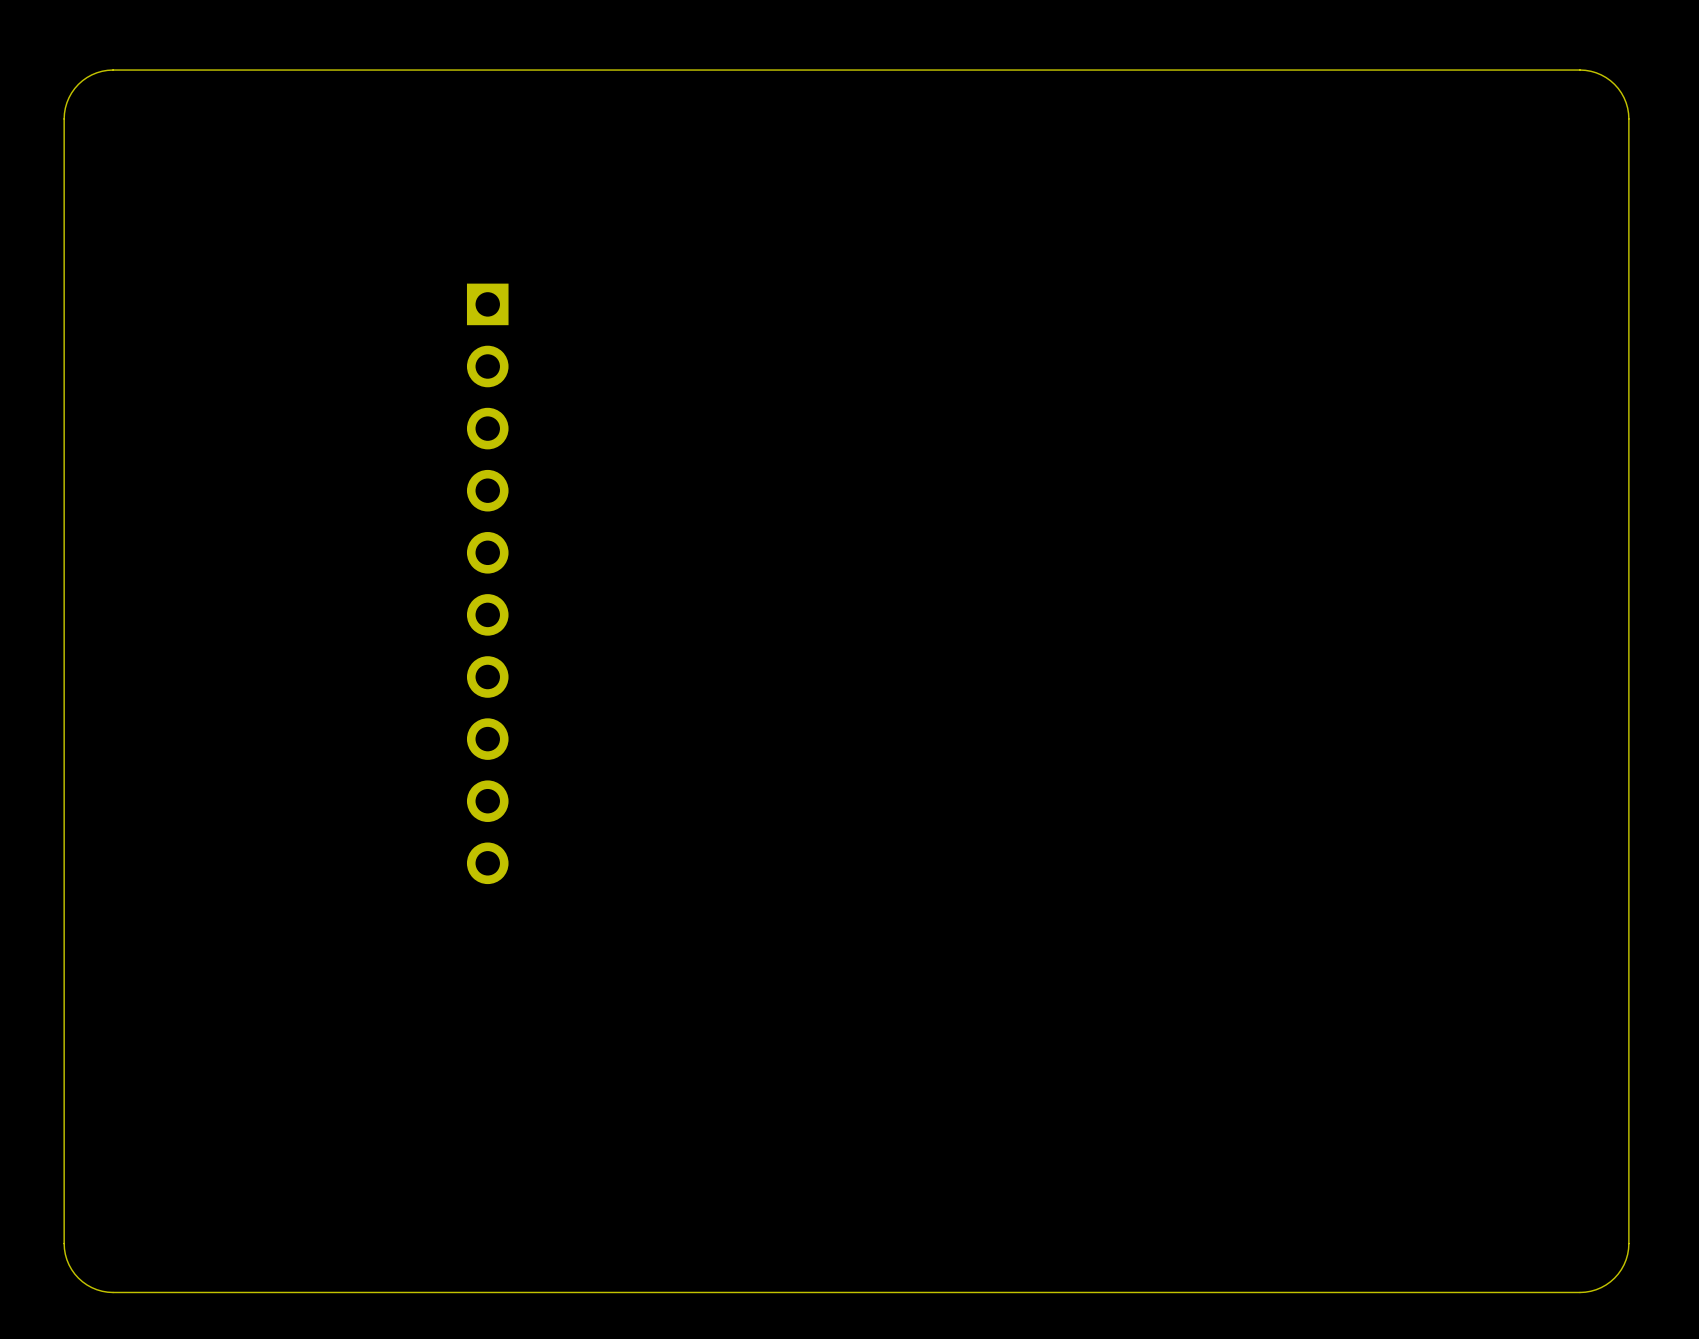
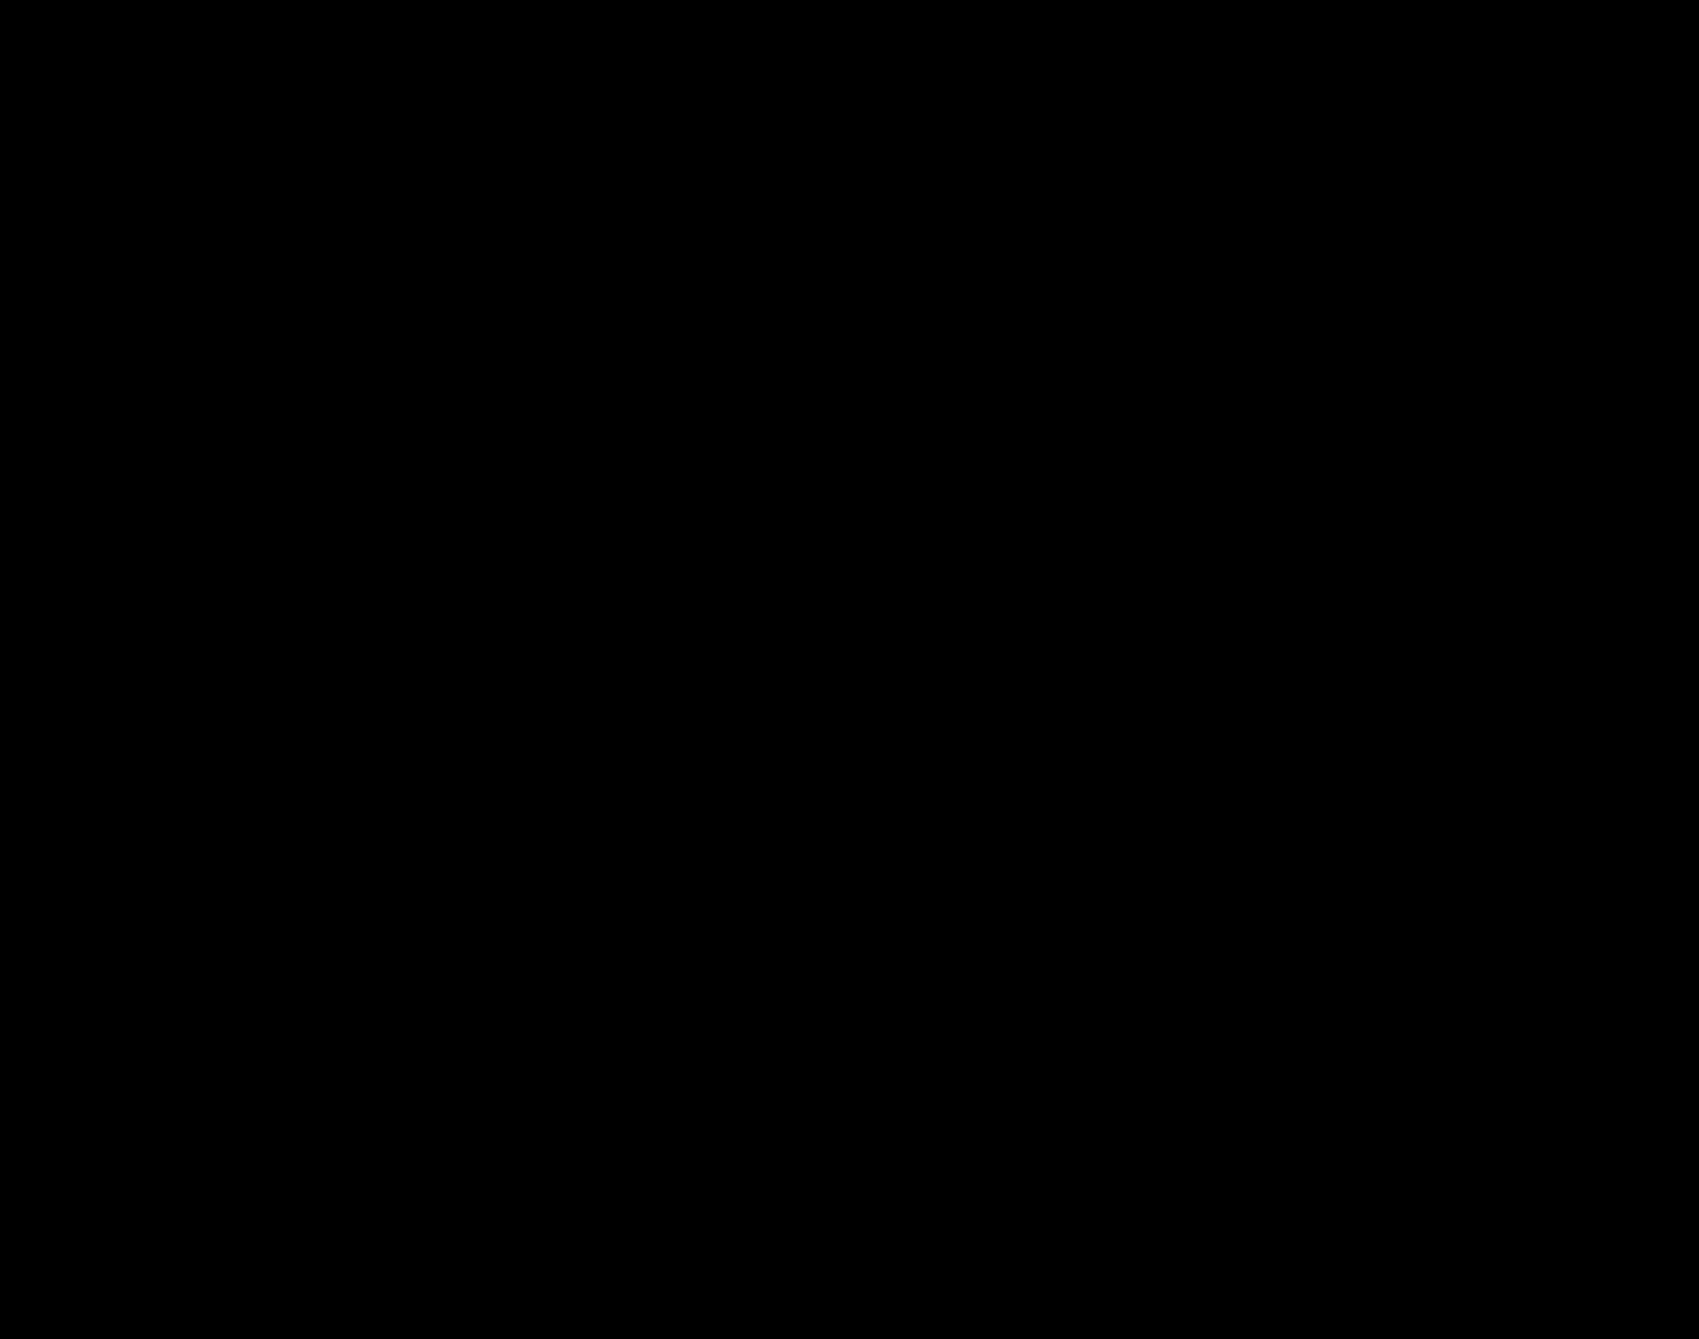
board edge: (1579, 70) (113, 70) (96, 72) (82, 80) (69, 97) (64, 118) (64, 1243) (66, 1259) (74, 1274) (91, 1287) (113, 1292) (1579, 1292) (1596, 1289) (1610, 1281) (1624, 1264) (1628, 1243) (1628, 118) (1626, 102) (1614, 84) (1596, 72) (1579, 70) -> none
part: (487, 583) -> none

